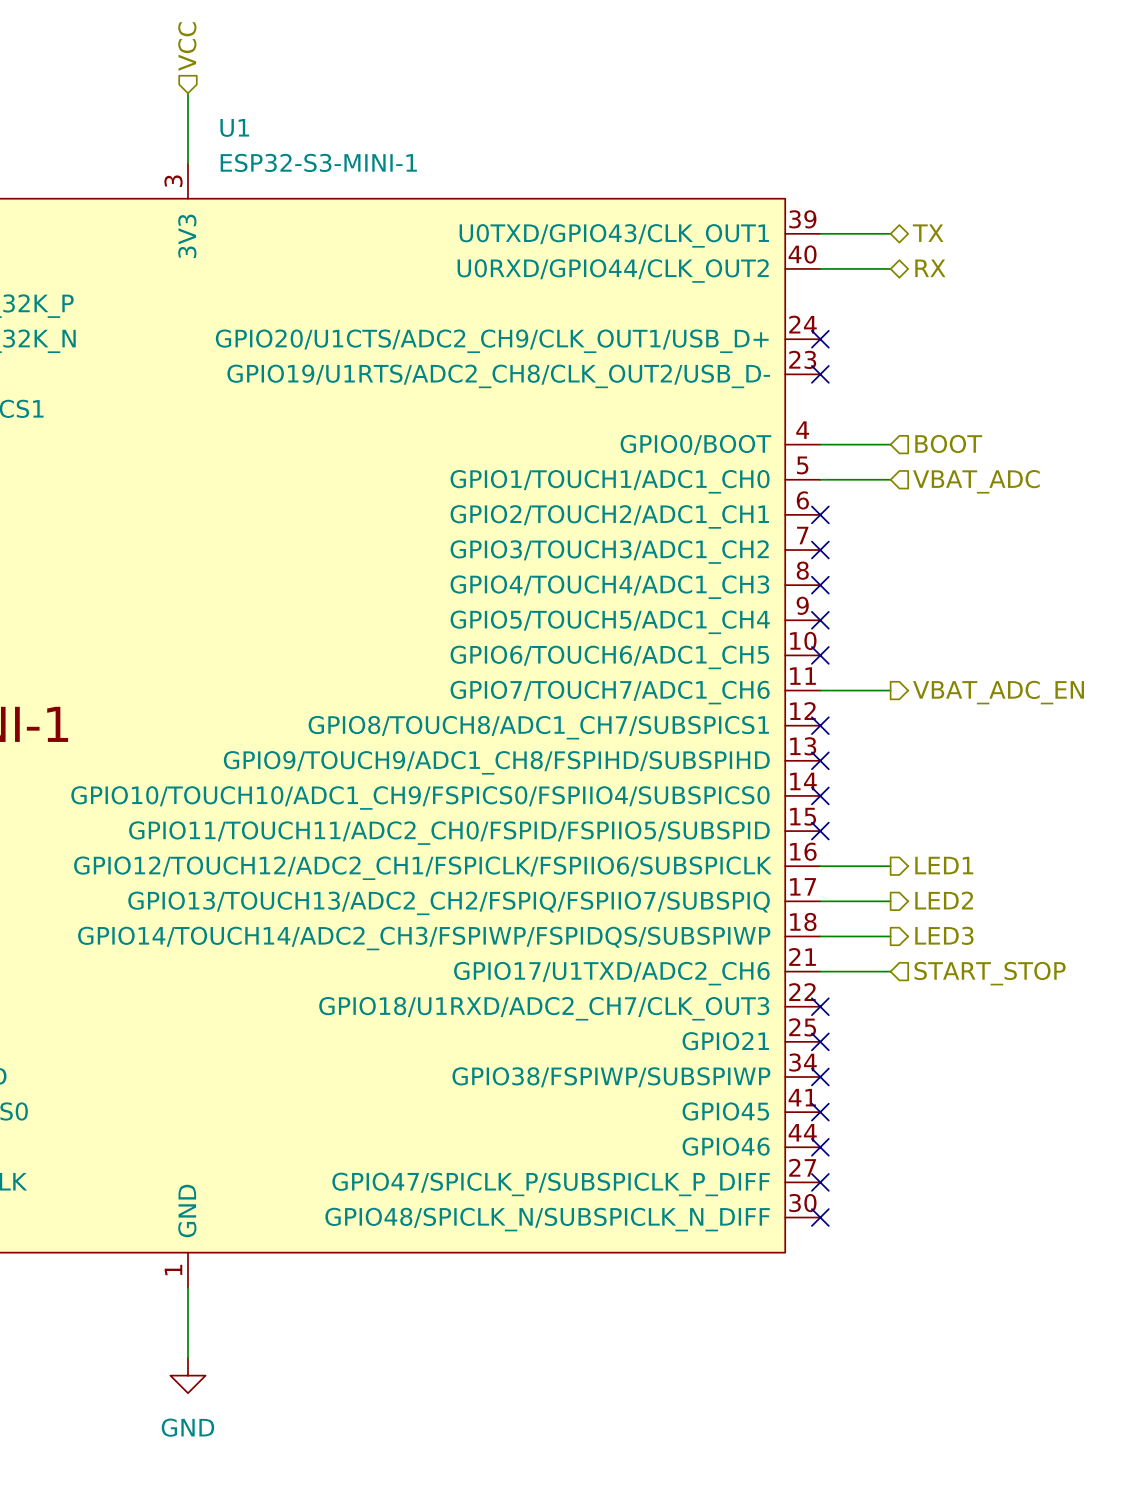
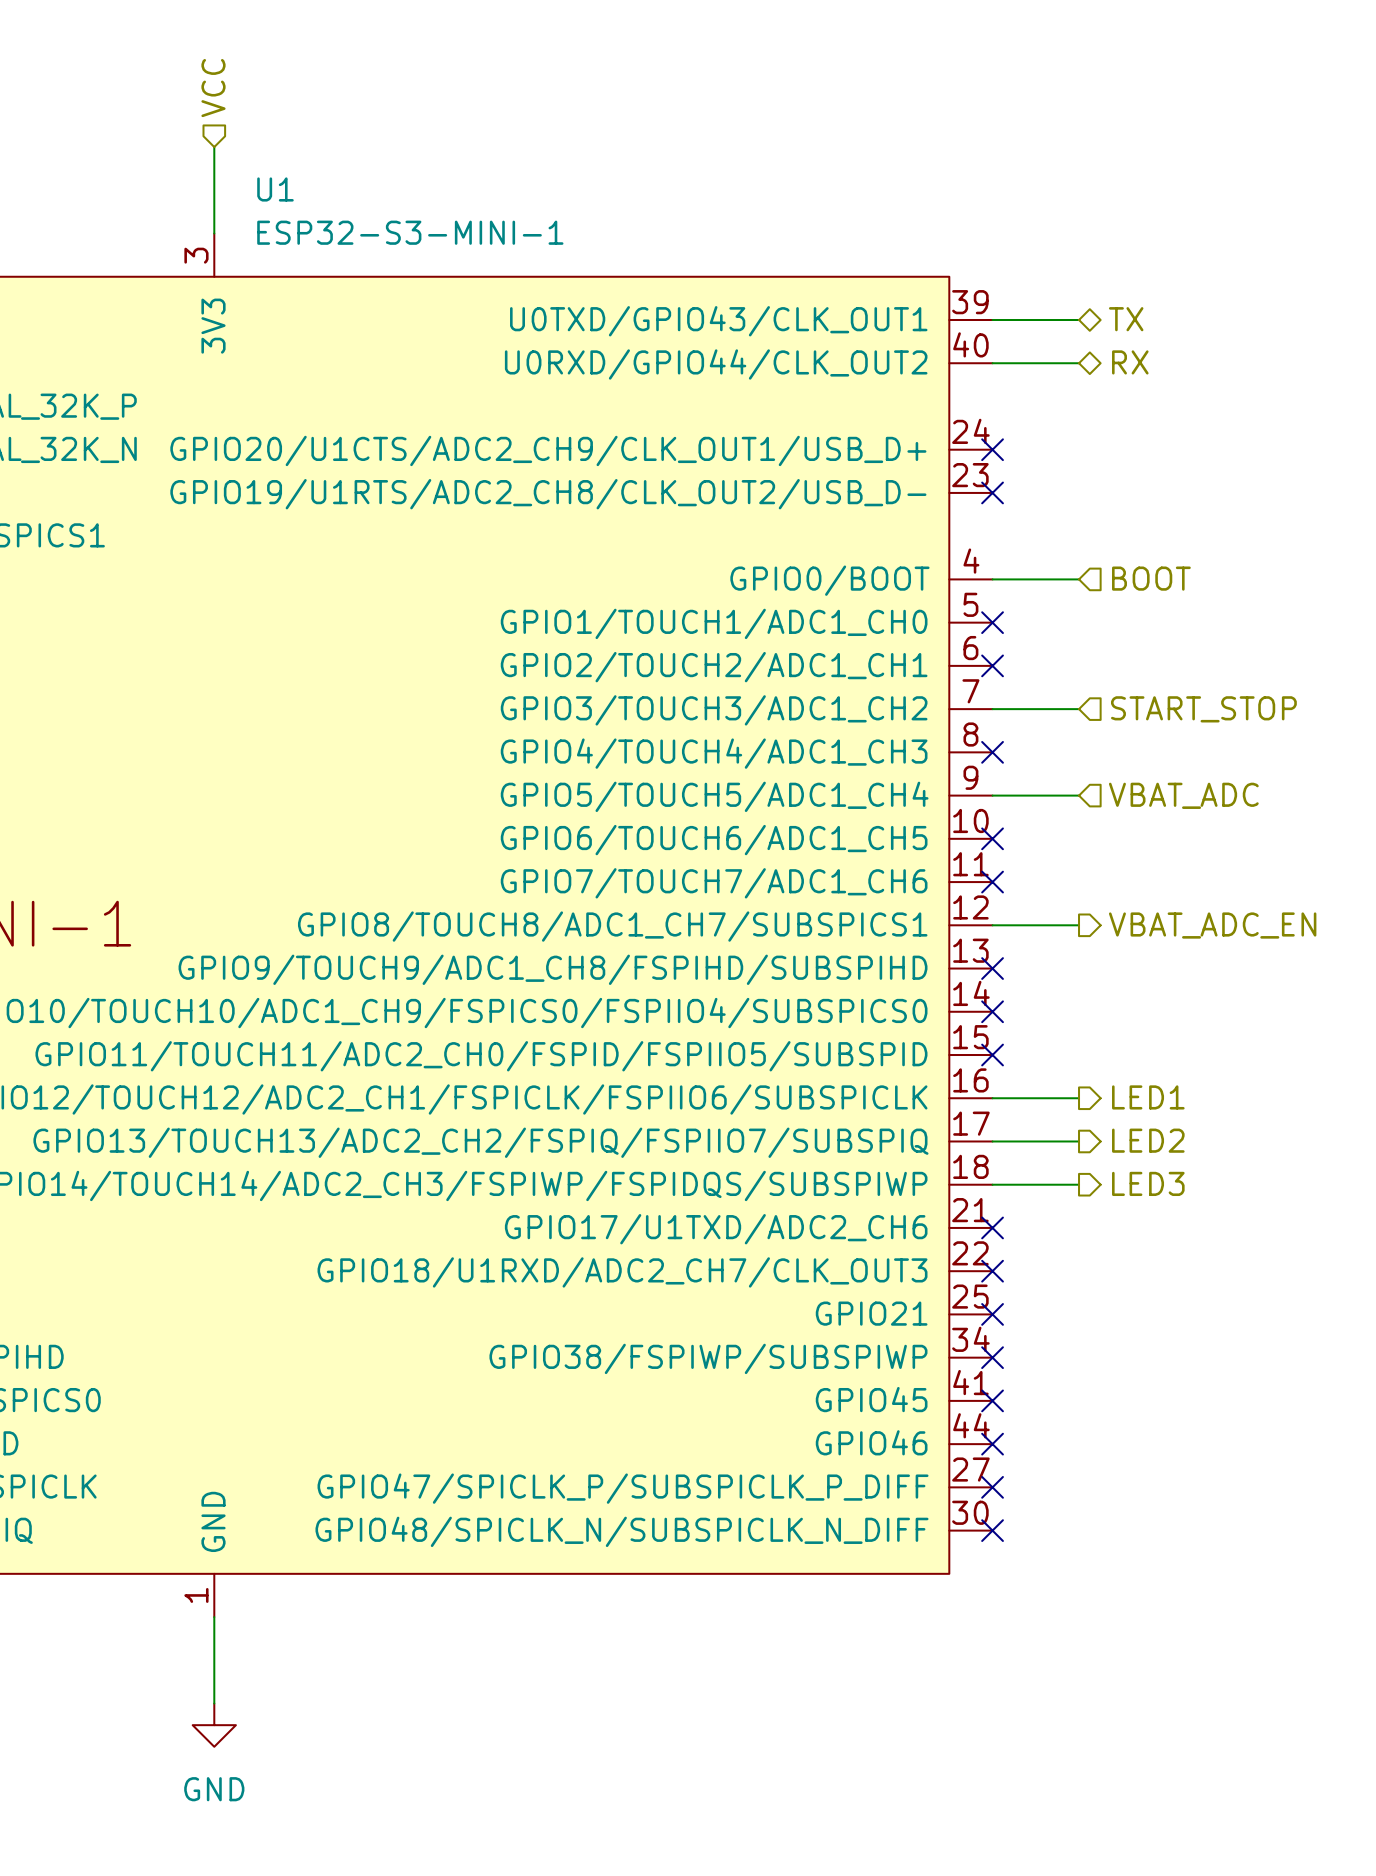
wire: (820, 479) (890, 479) -> (992, 709) (1079, 709)
no-connect mark: none -> (992, 622)
hierarchical label position: VBAT_ADC (976, 481) -> VBAT_ADC (1183, 795)
no-connect mark: (820, 550) -> none
hierarchical label: none -> START_STOP (1203, 709)
wire: none -> (992, 795) (1079, 795)
no-connect mark: (820, 620) -> none
wire: (820, 690) (890, 690) -> (992, 925) (1079, 925)
no-connect mark: none -> (992, 882)
hierarchical label position: VBAT_ADC_EN (998, 692) -> VBAT_ADC_EN (1212, 925)
no-connect mark: (820, 725) -> none
wire: (820, 971) (890, 971) -> none
no-connect mark: none -> (992, 1227)
hierarchical label: START_STOP (990, 973) -> none

